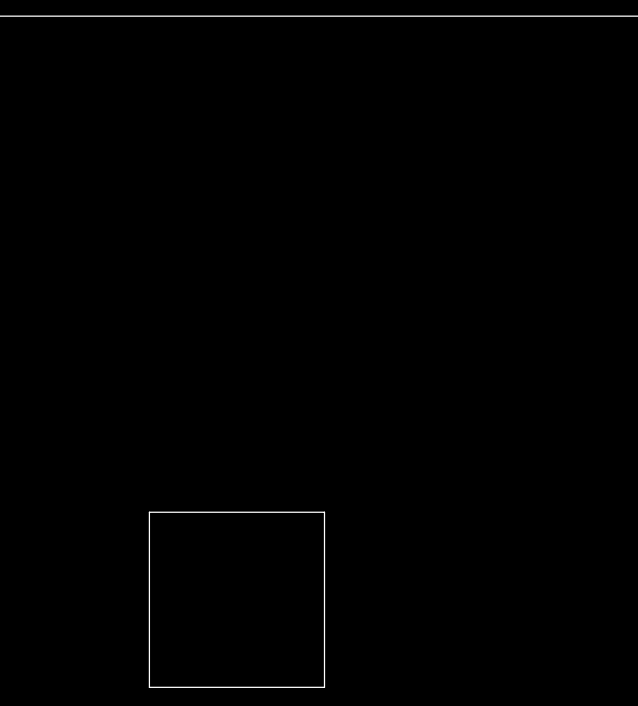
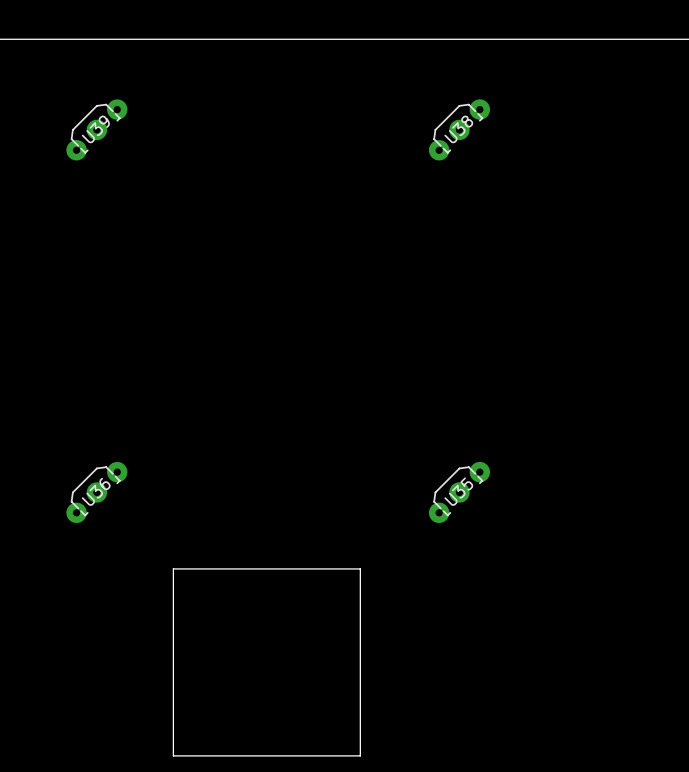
U39: none -> (96, 129)
U38: none -> (459, 129)
U36: none -> (96, 492)
U35: none -> (459, 492)

